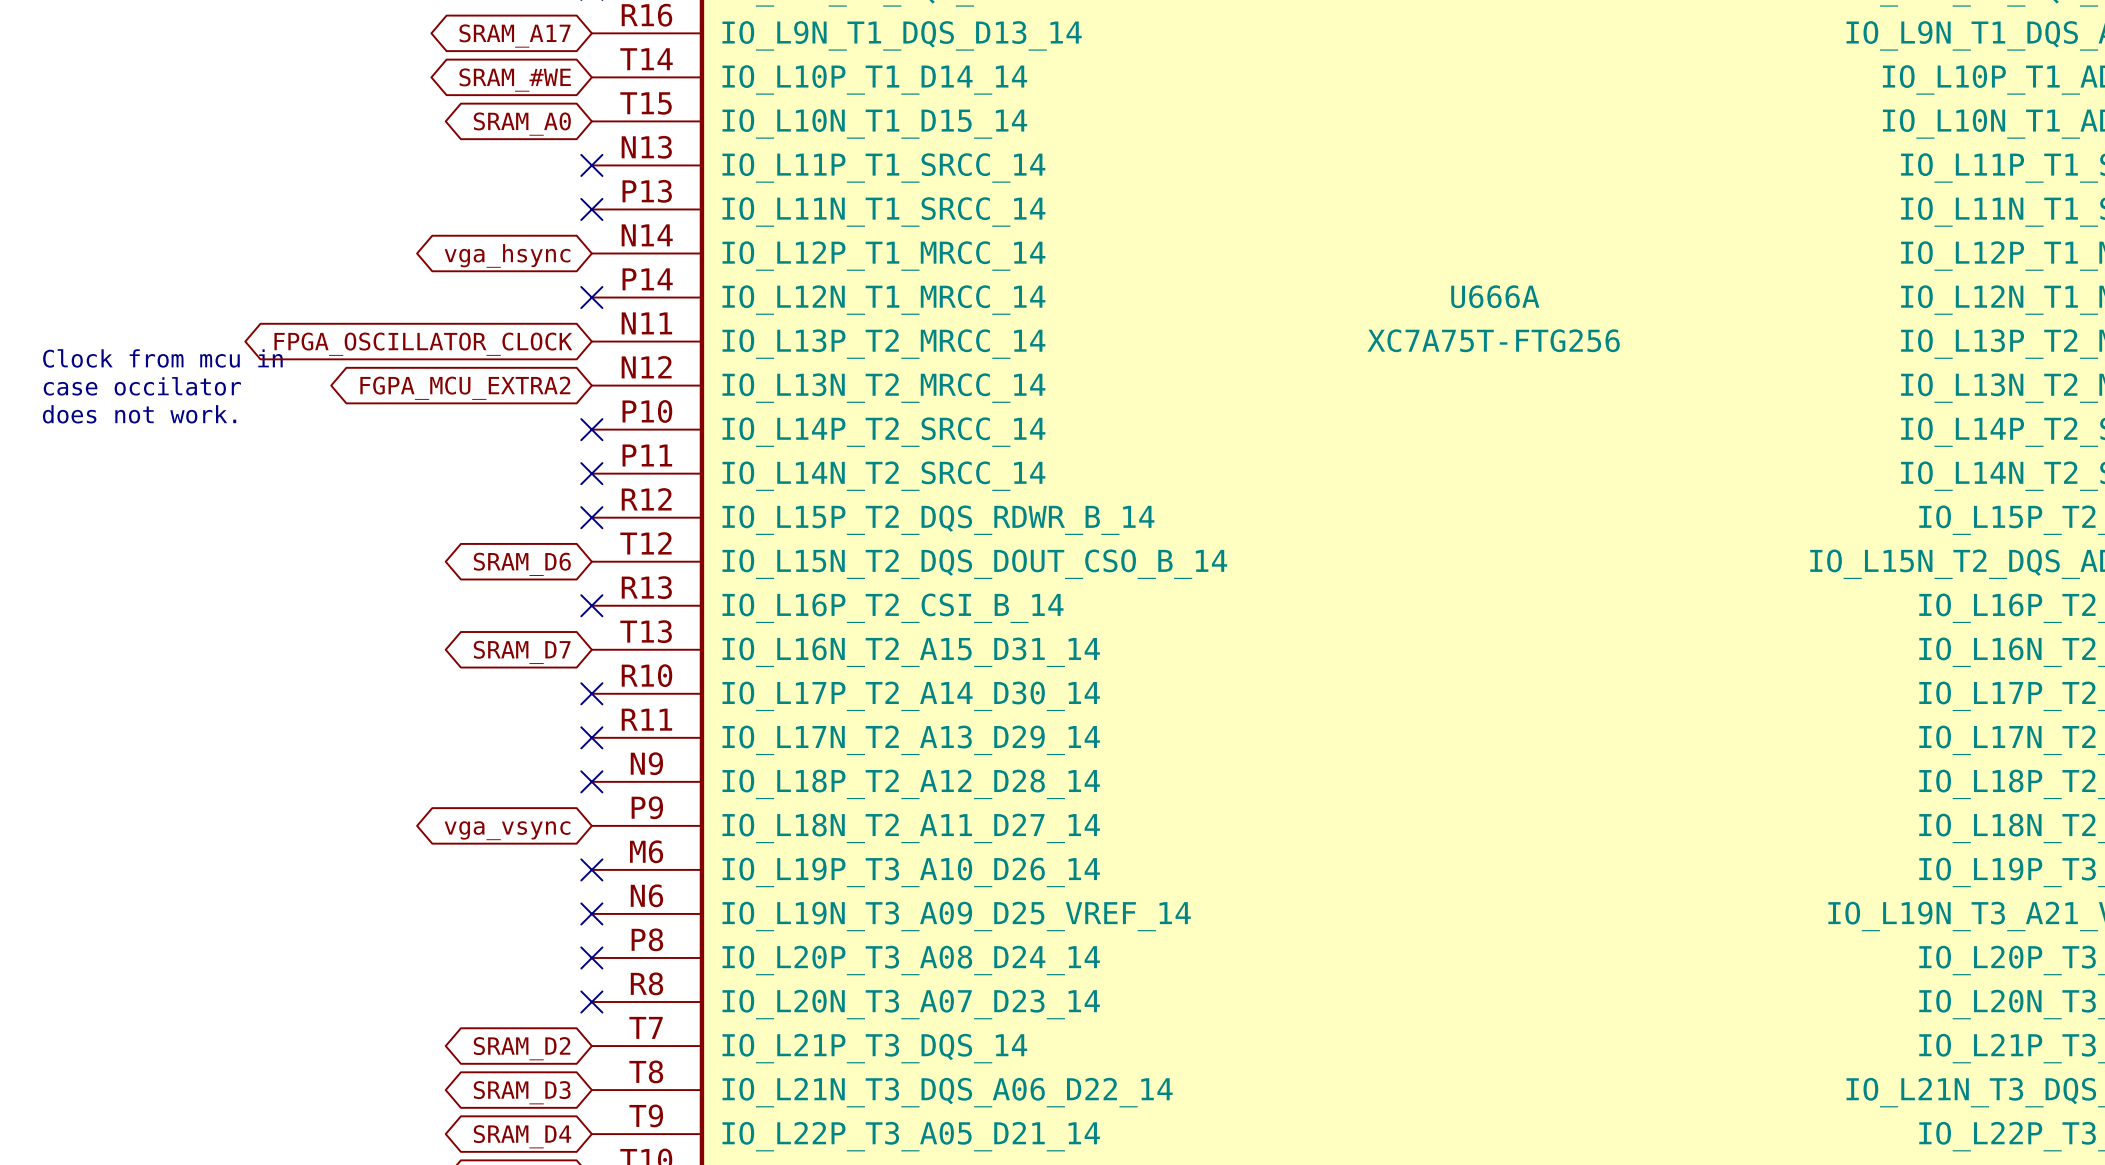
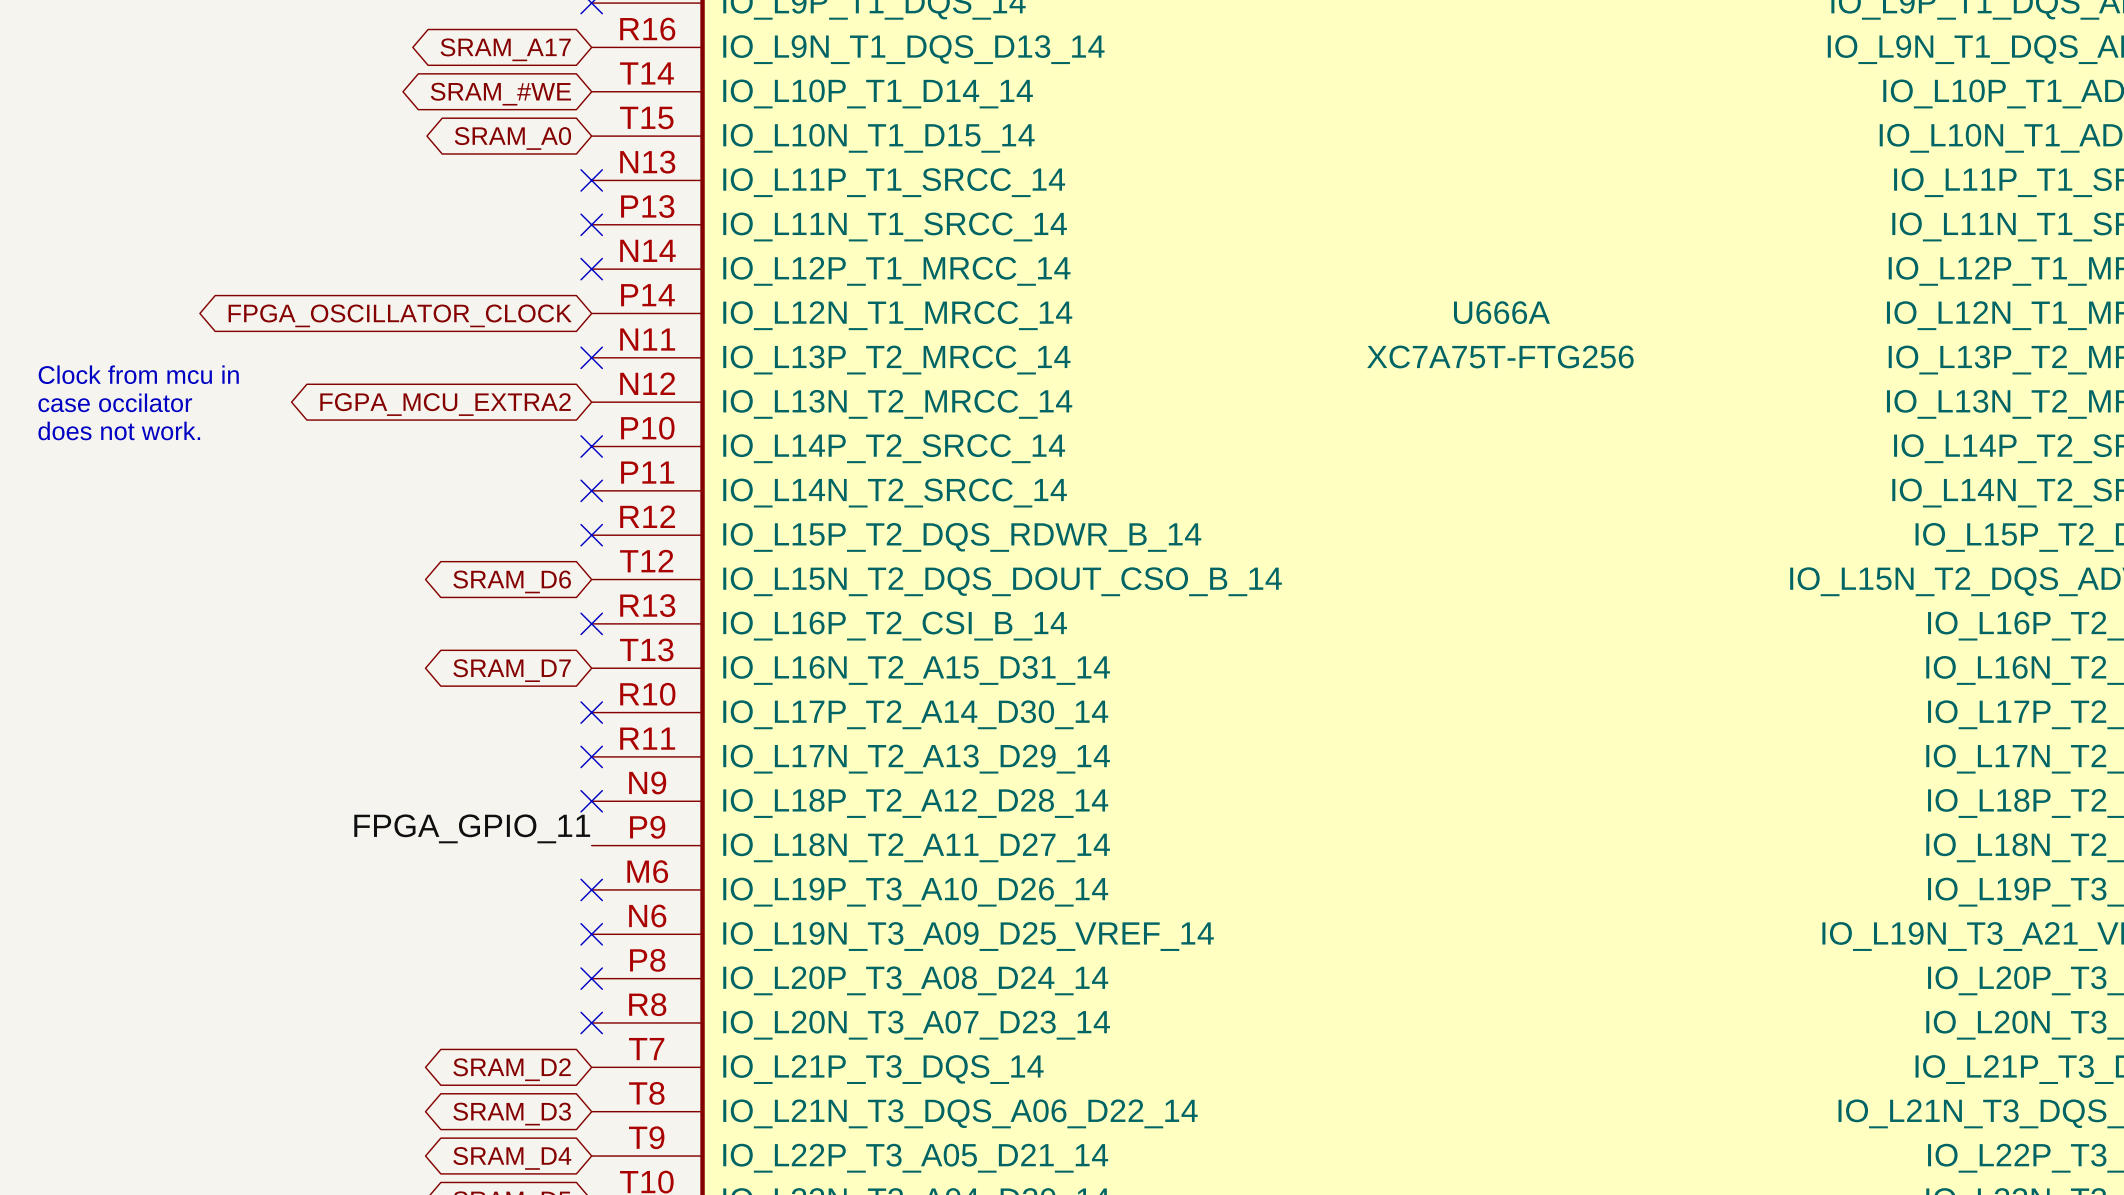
no-connect mark: none -> (591, 269)
global label: vga_hsync (507, 255) -> none
no-connect mark: (591, 297) -> none
no-connect mark: none -> (591, 357)
global label position: FPGA_OSCILLATOR_CLOCK (423, 344) -> FPGA_OSCILLATOR_CLOCK (400, 315)
label: none -> FPGA_GPIO_11 (472, 828)
global label: vga_vsync (507, 830) -> none

